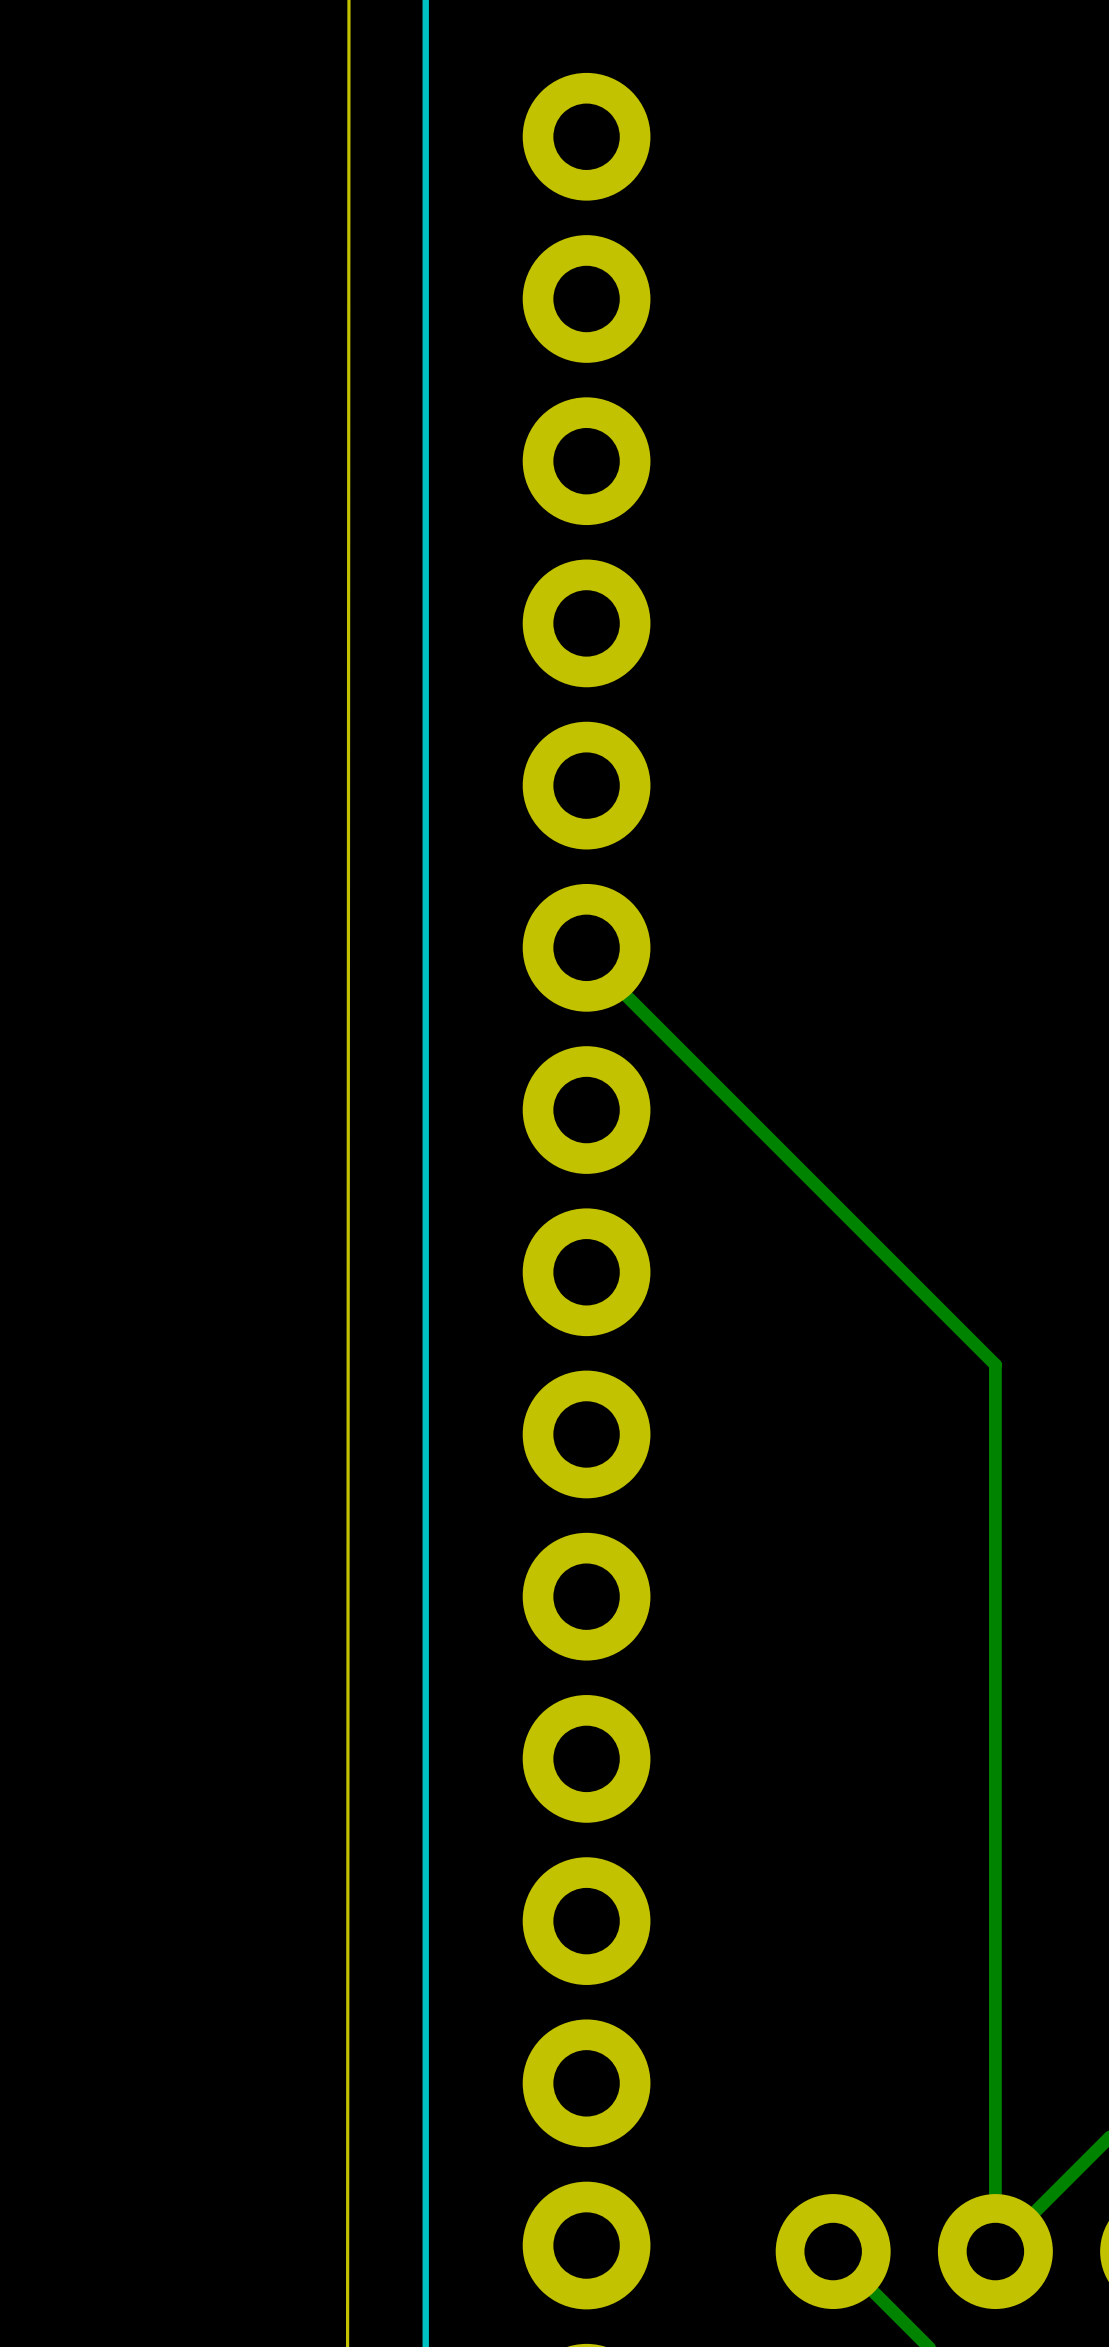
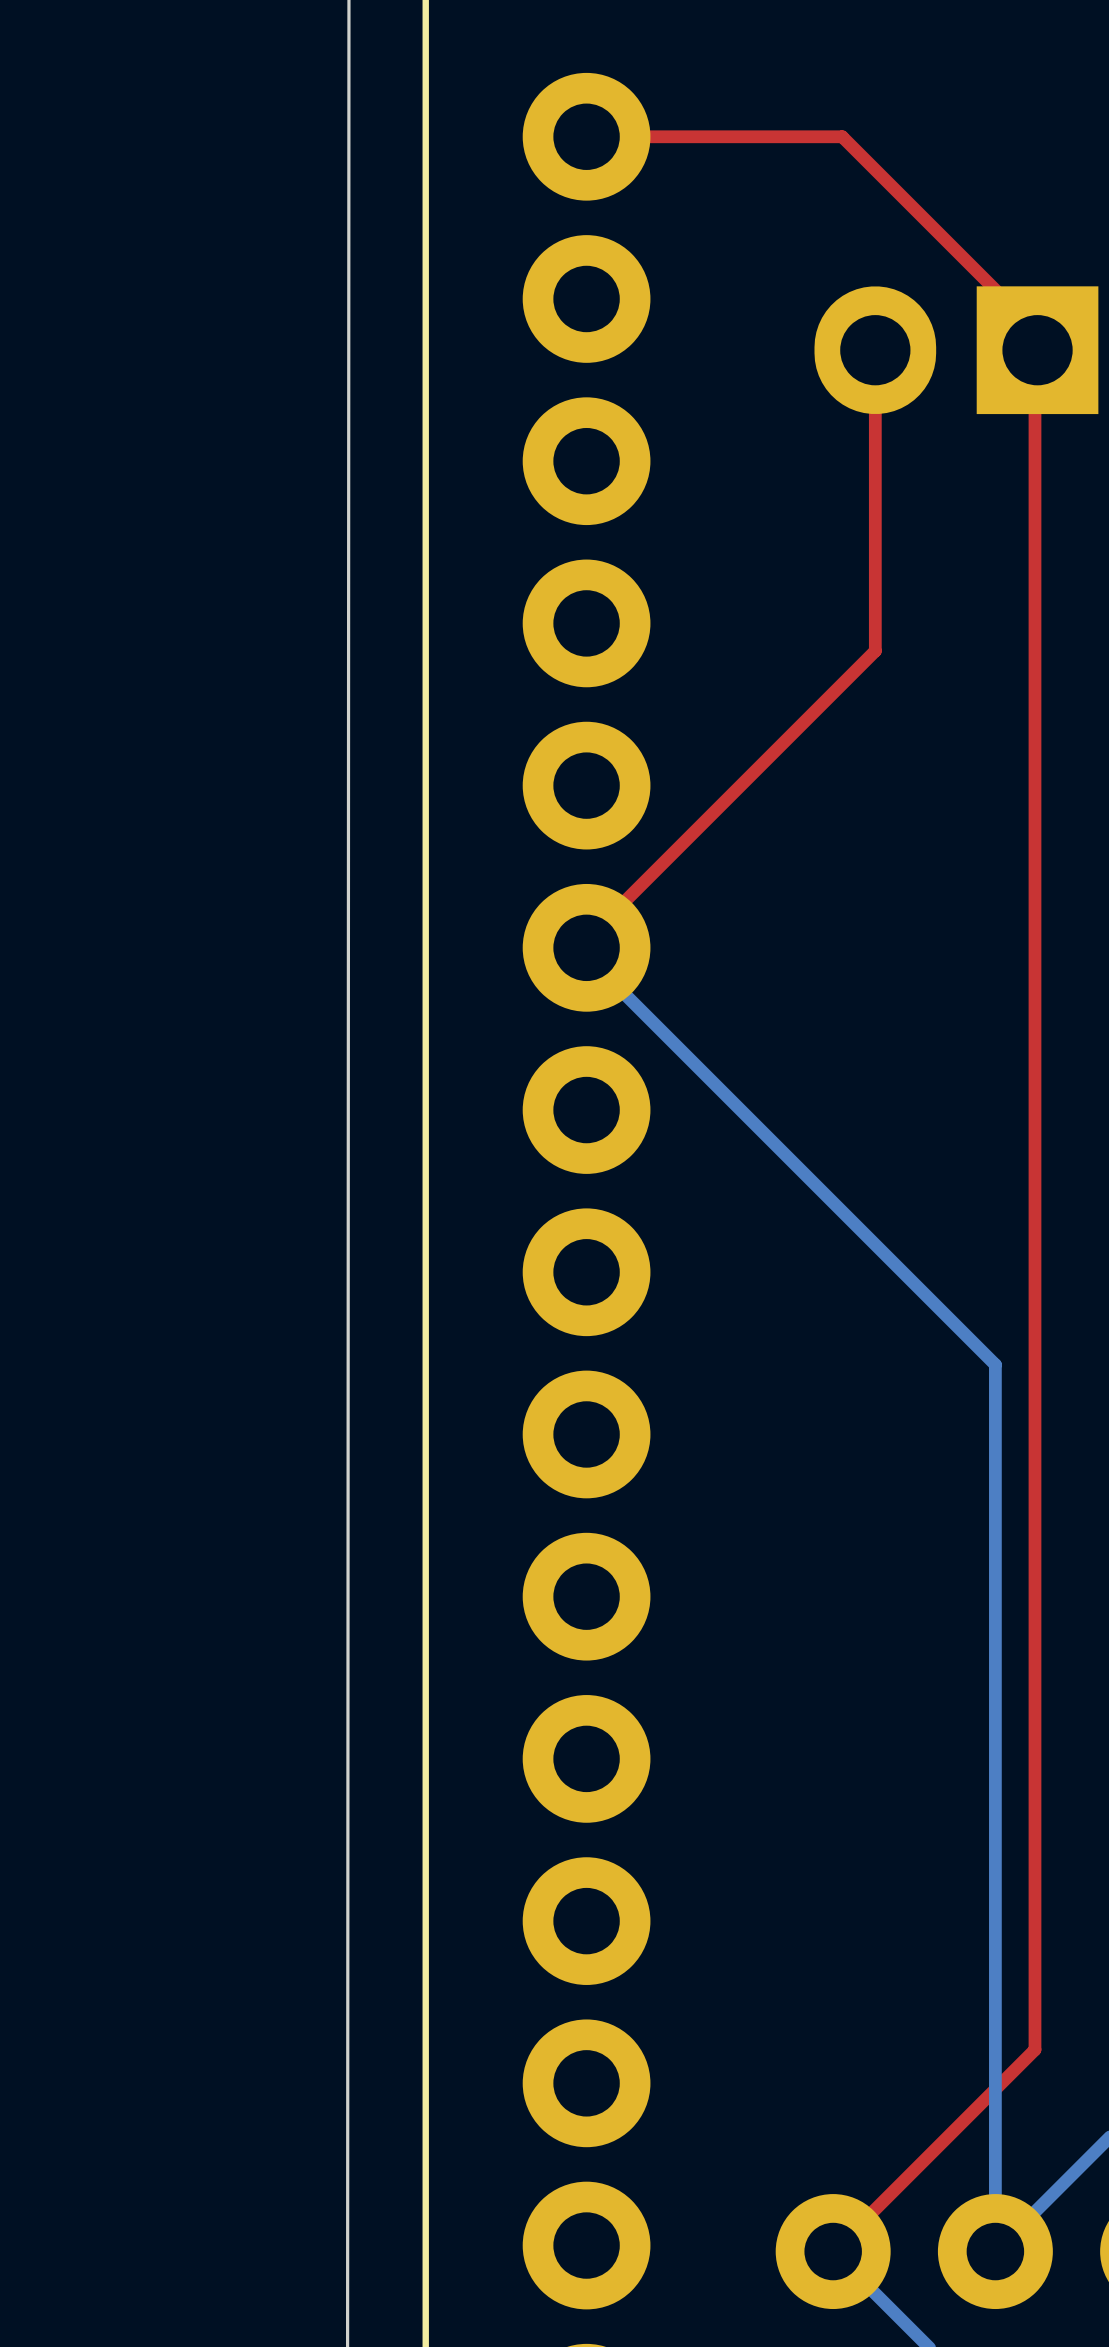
top track: none -> (578, 136) (842, 136) (1034, 329) (1034, 2049) (833, 2251)
top track: none -> (875, 332) (875, 650) (578, 947)
part: none -> (956, 350)

